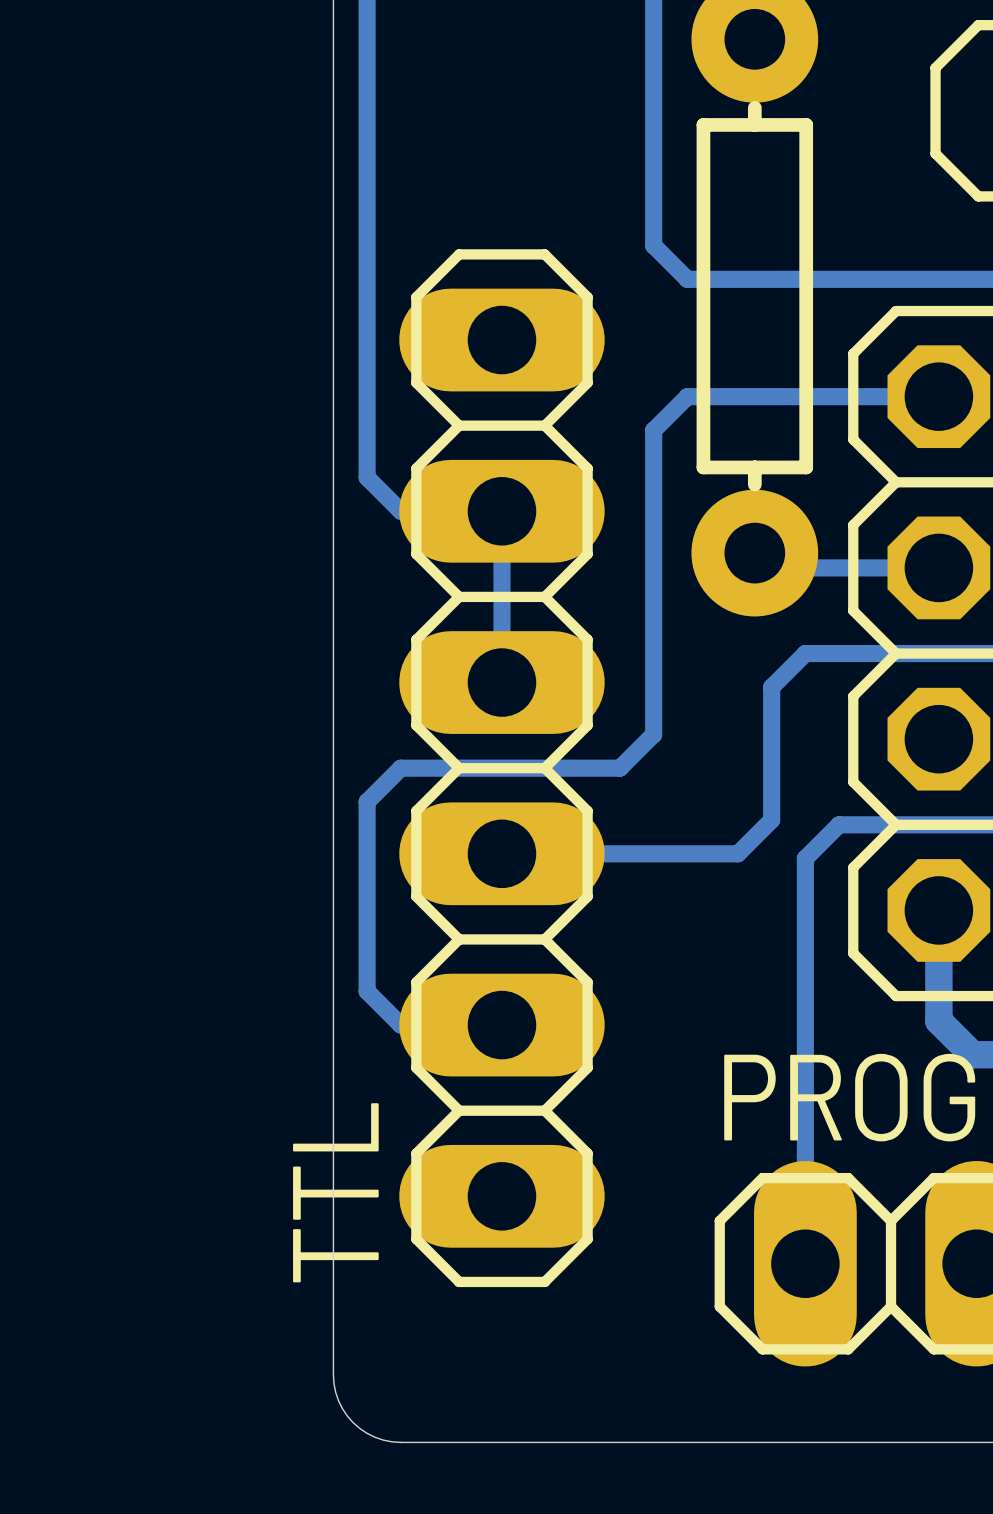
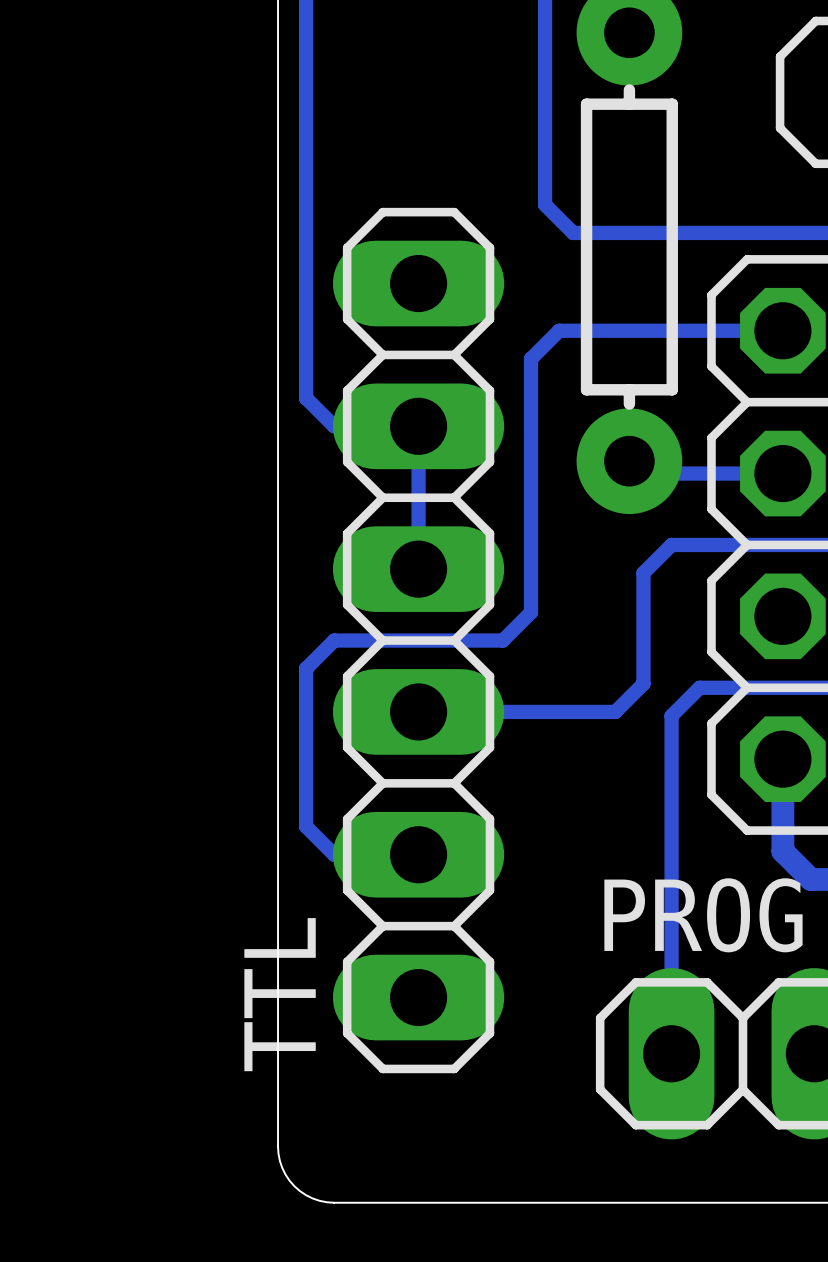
bottom track: (687, 396) (653, 430) (653, 734) (619, 768) (603, 768) -> (573, 330) (559, 330) (531, 358) (531, 612) (502, 640)

